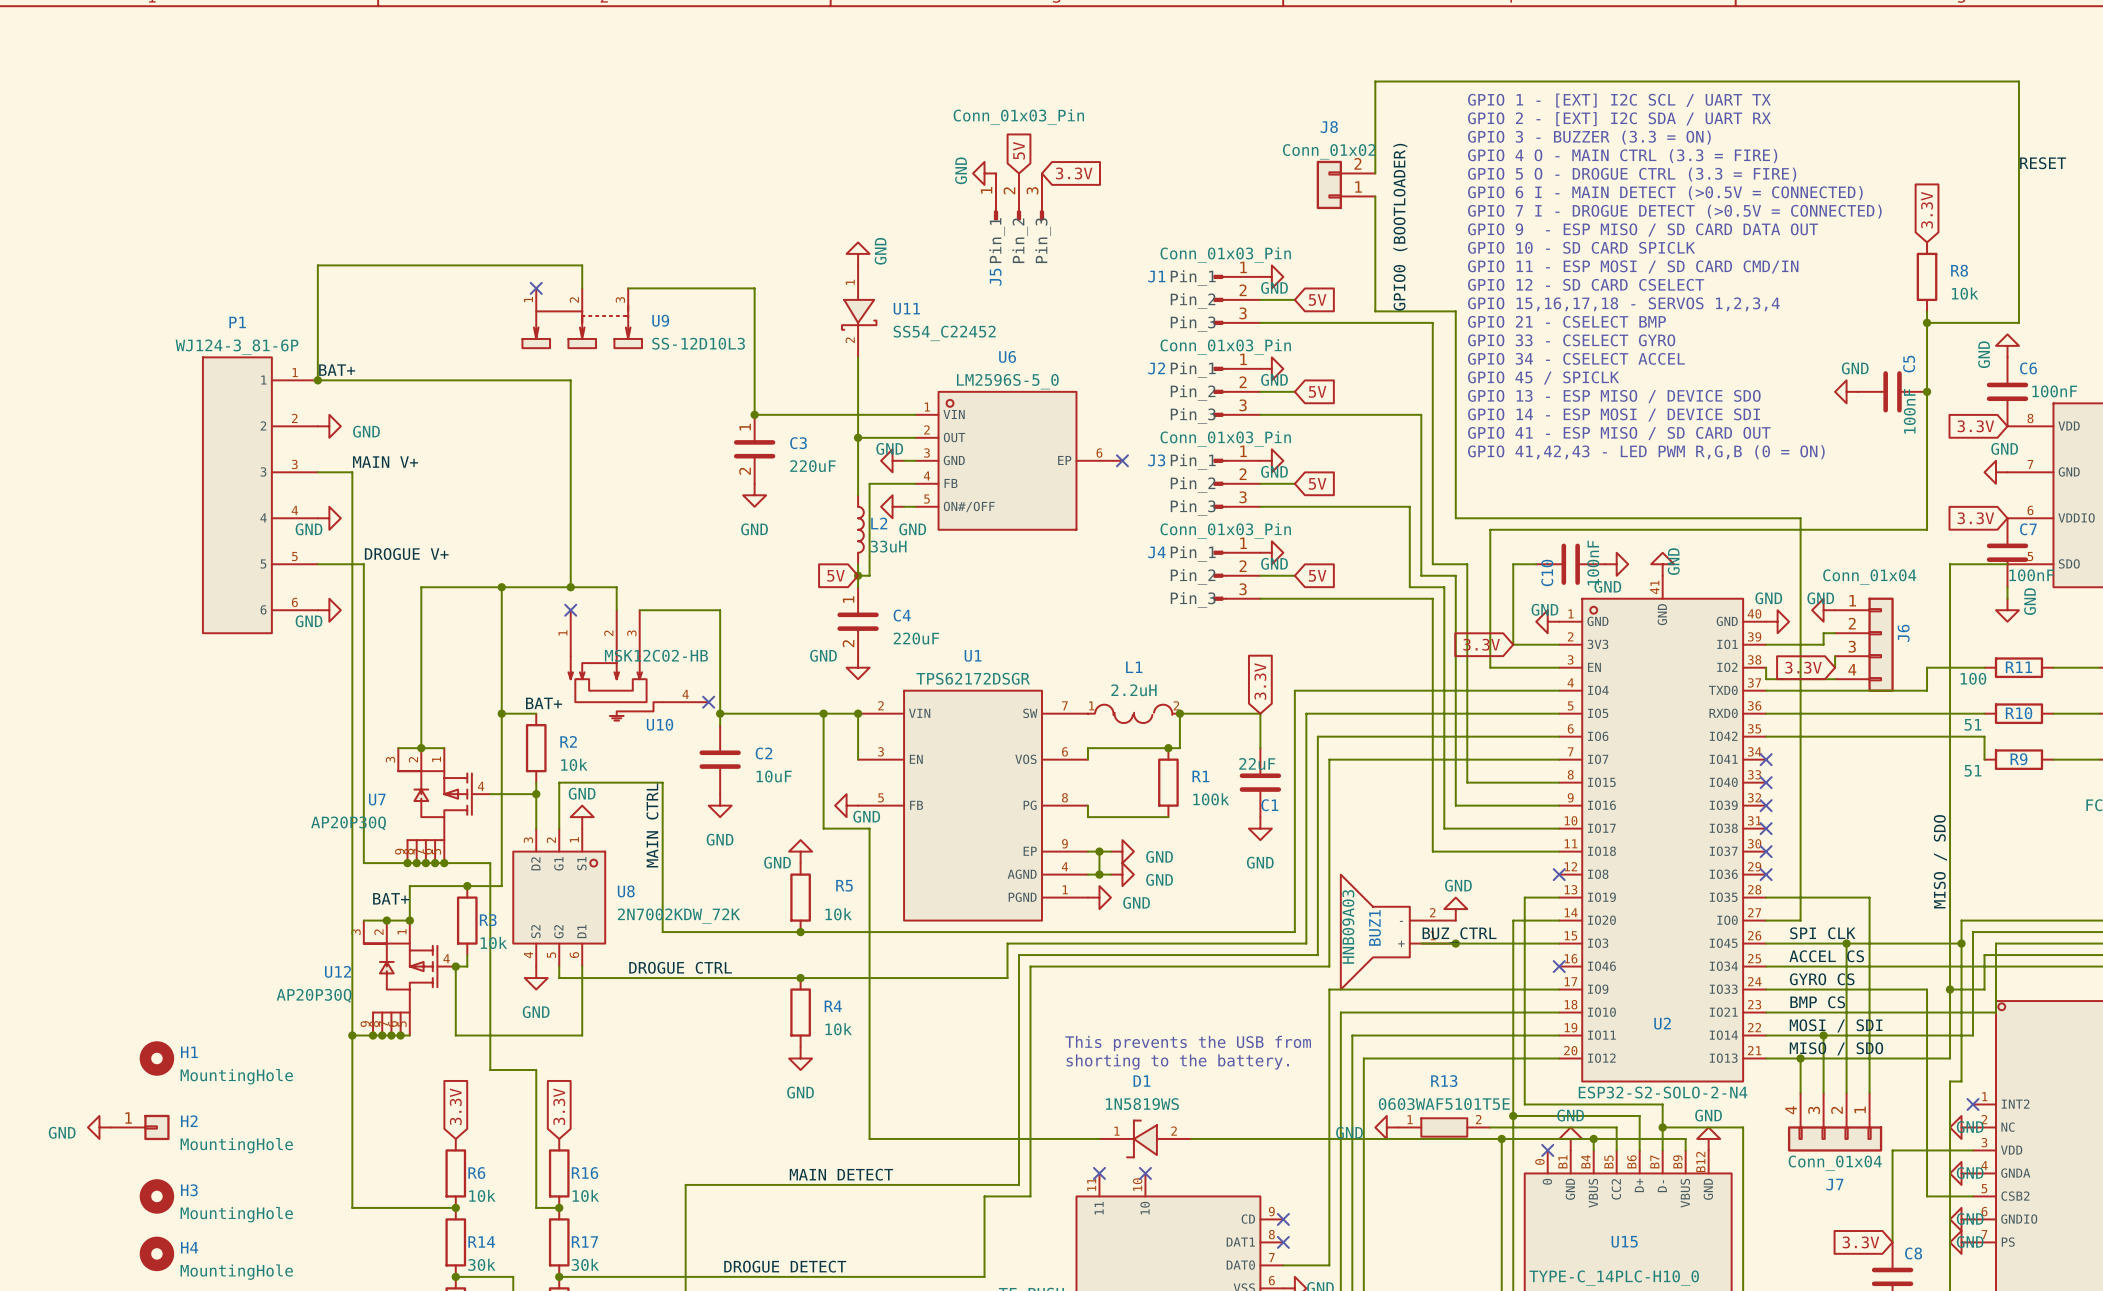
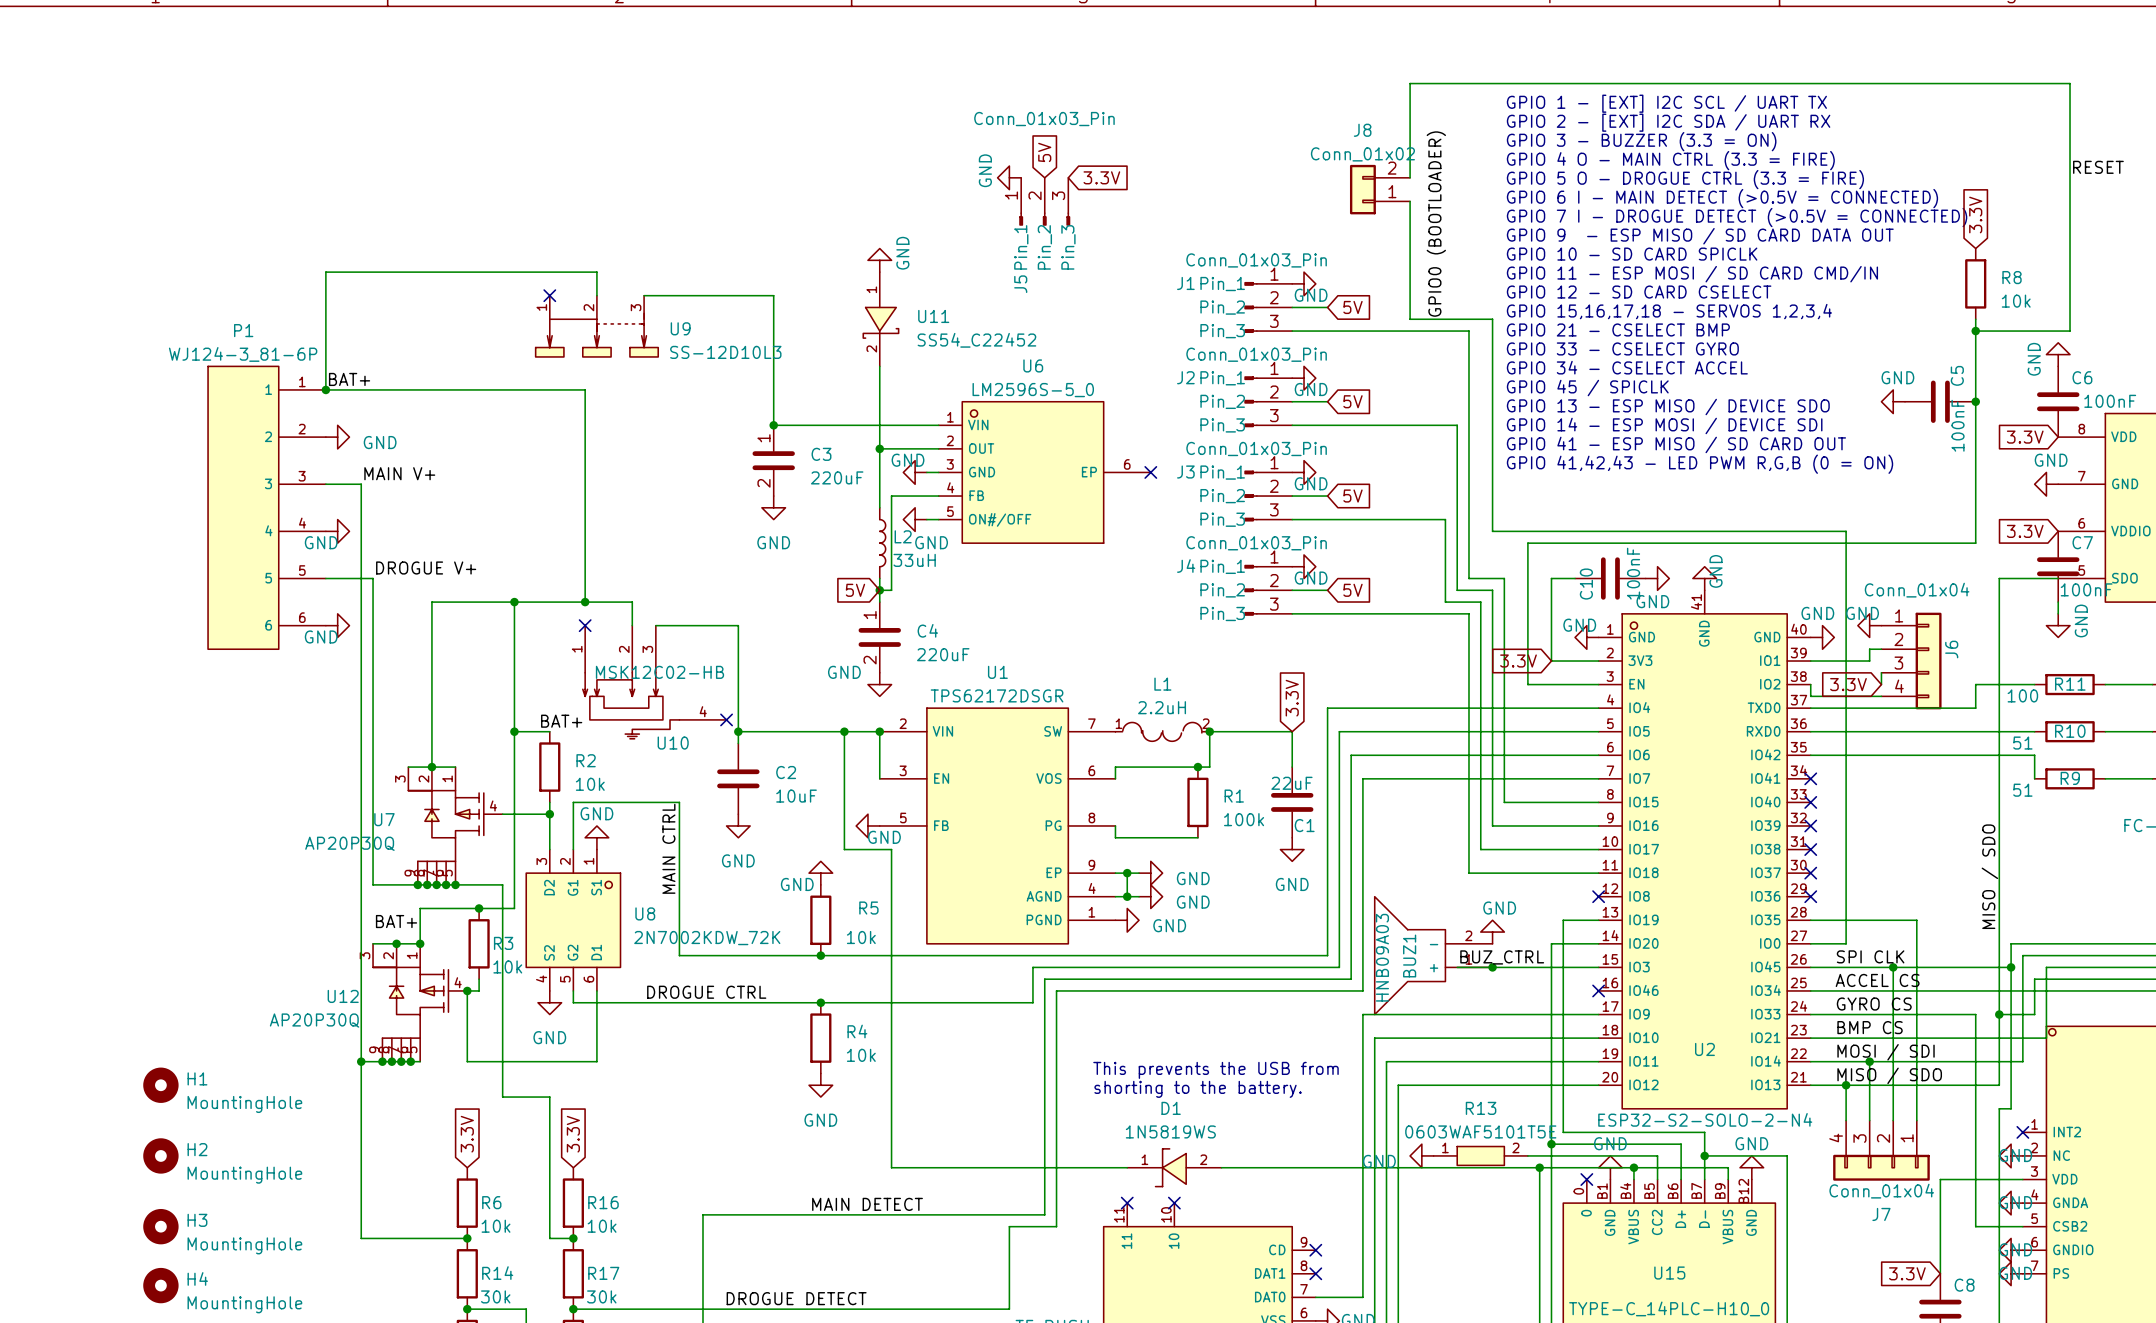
H2 symbol: [110, 1114, 170, 1141] -> [143, 1138, 179, 1174]
power symbol: GND (99, 1127) -> none

